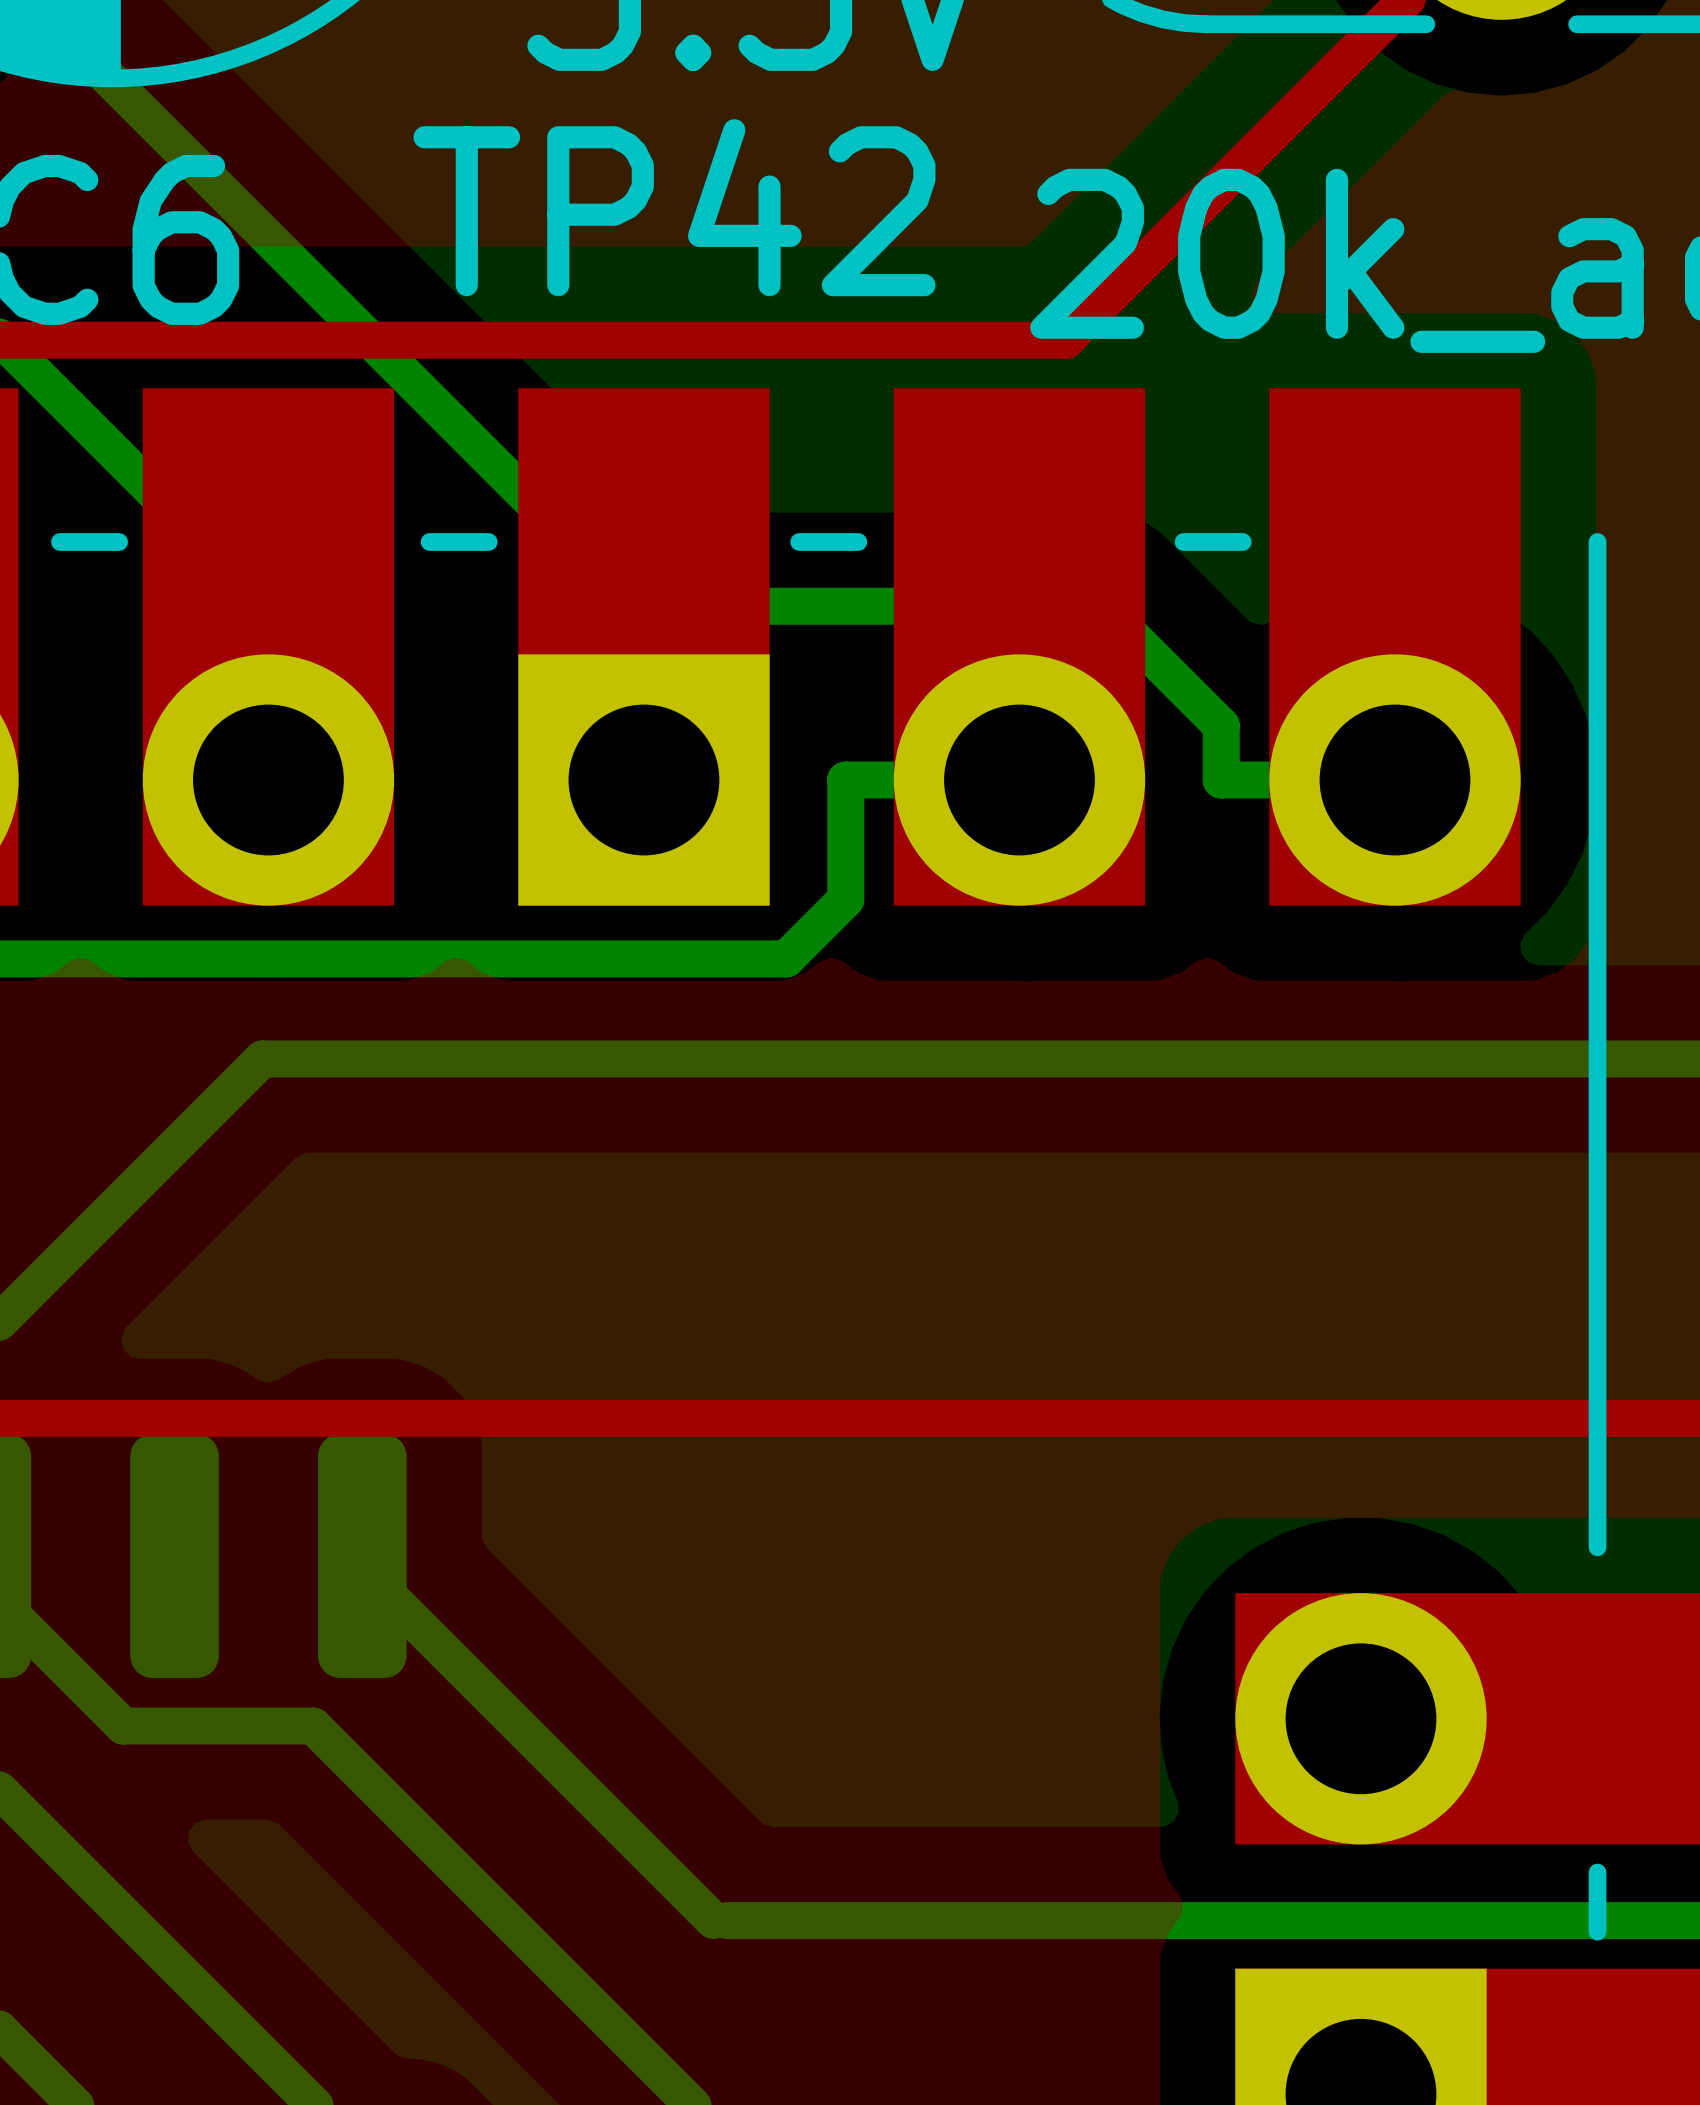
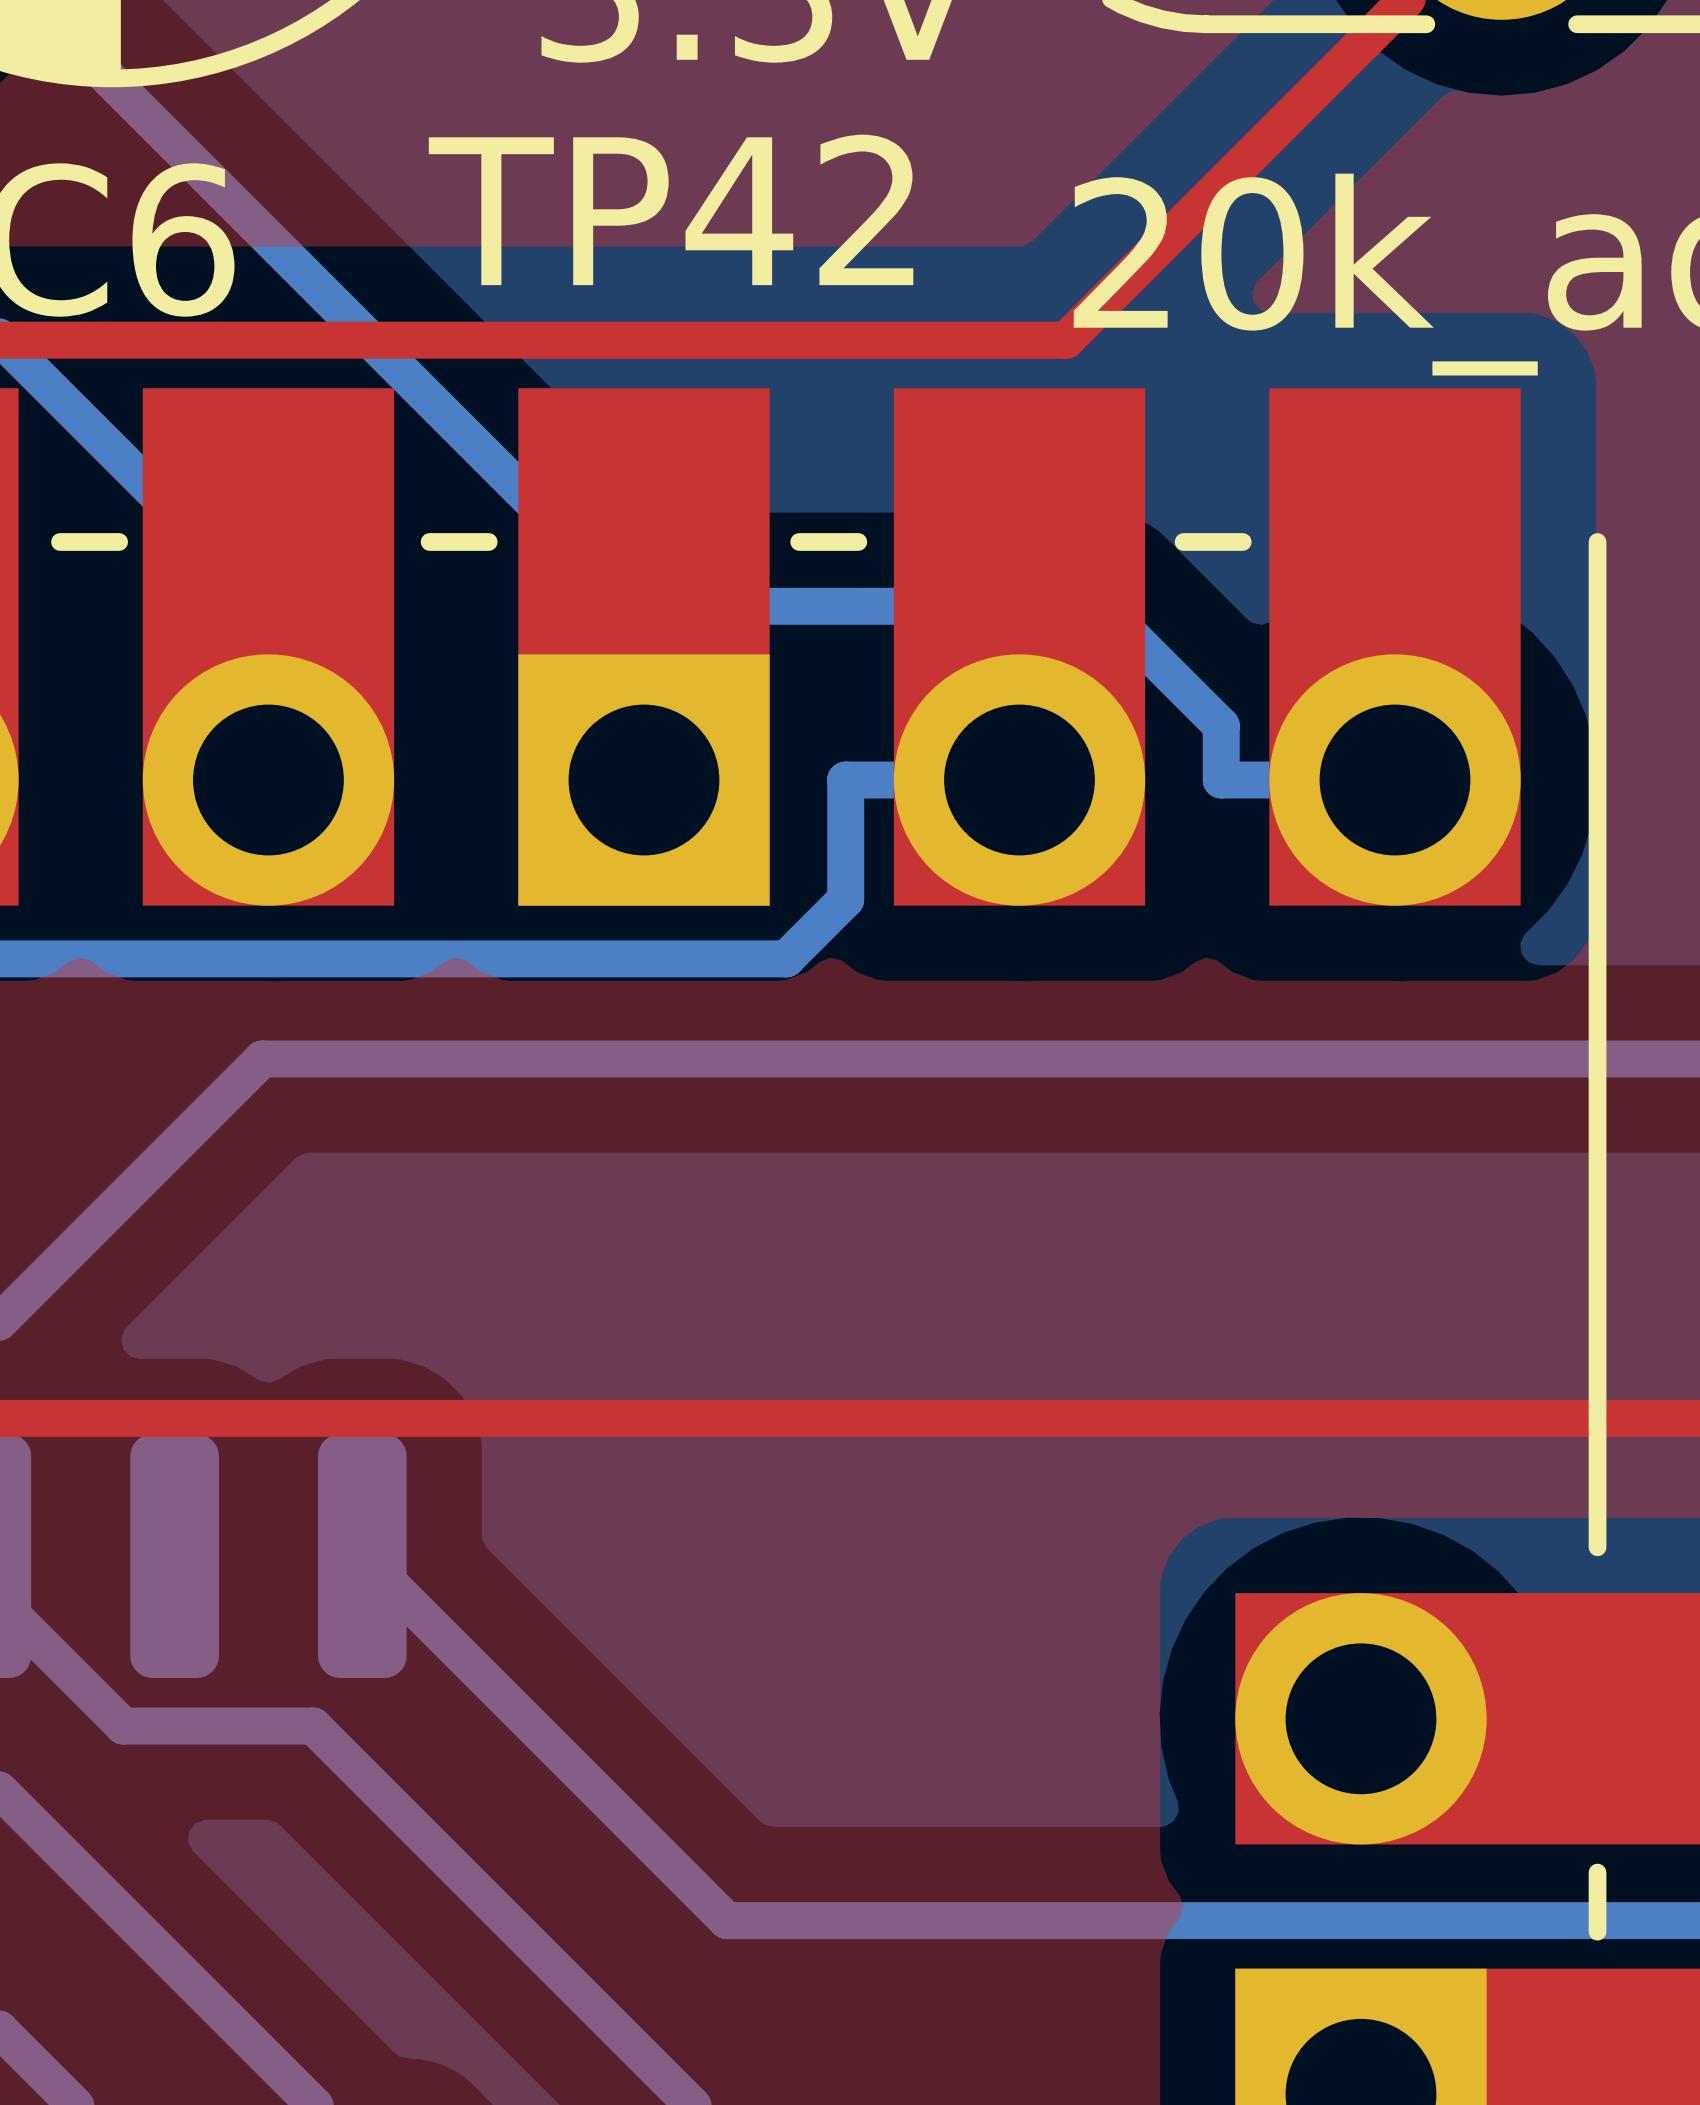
bottom track: (349, 1556) (713, 1920) -> (362, 1556) (726, 1920)

